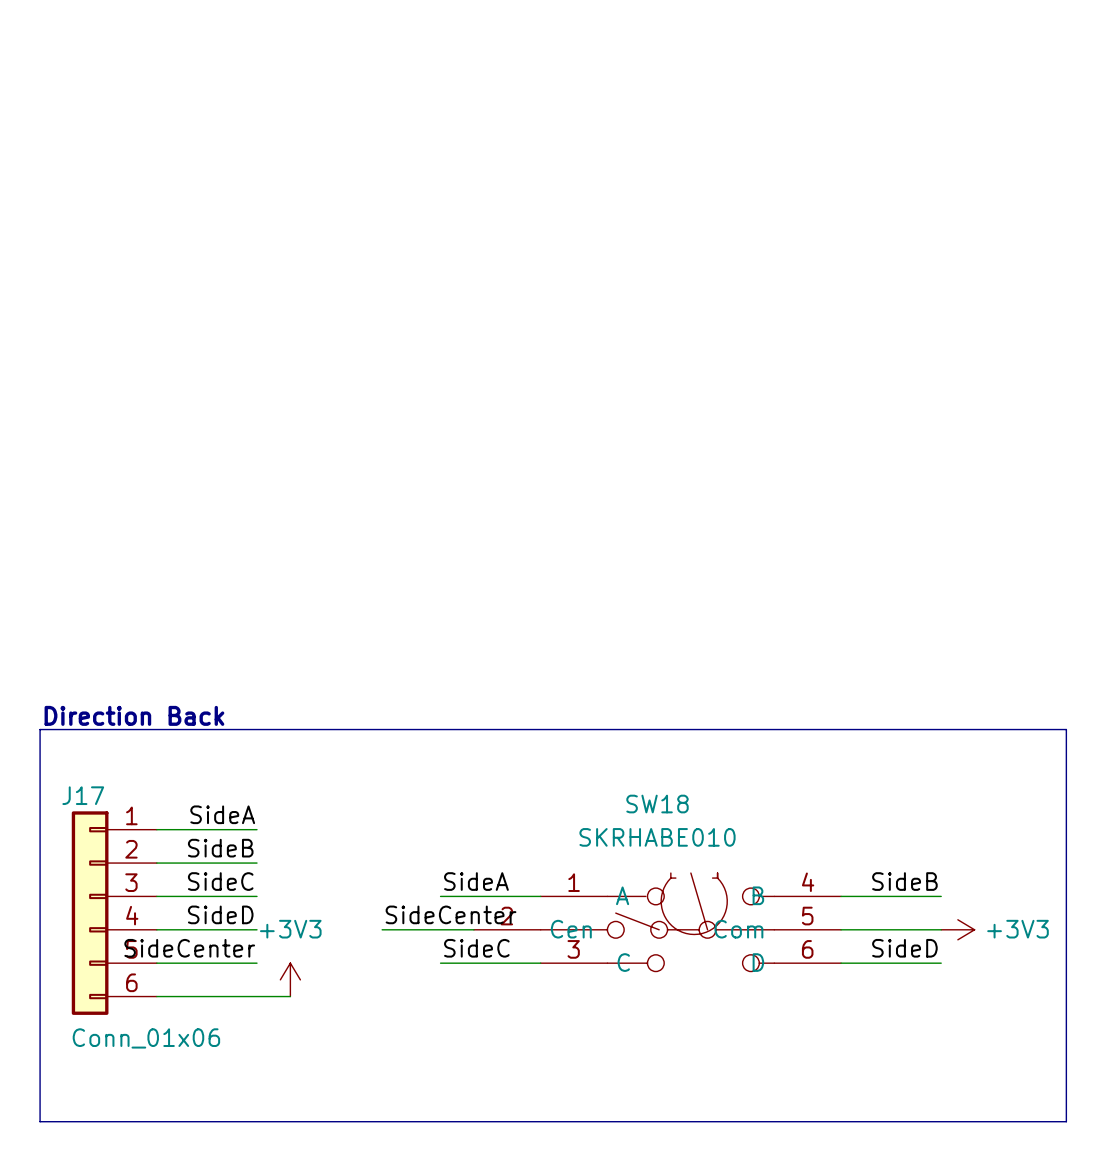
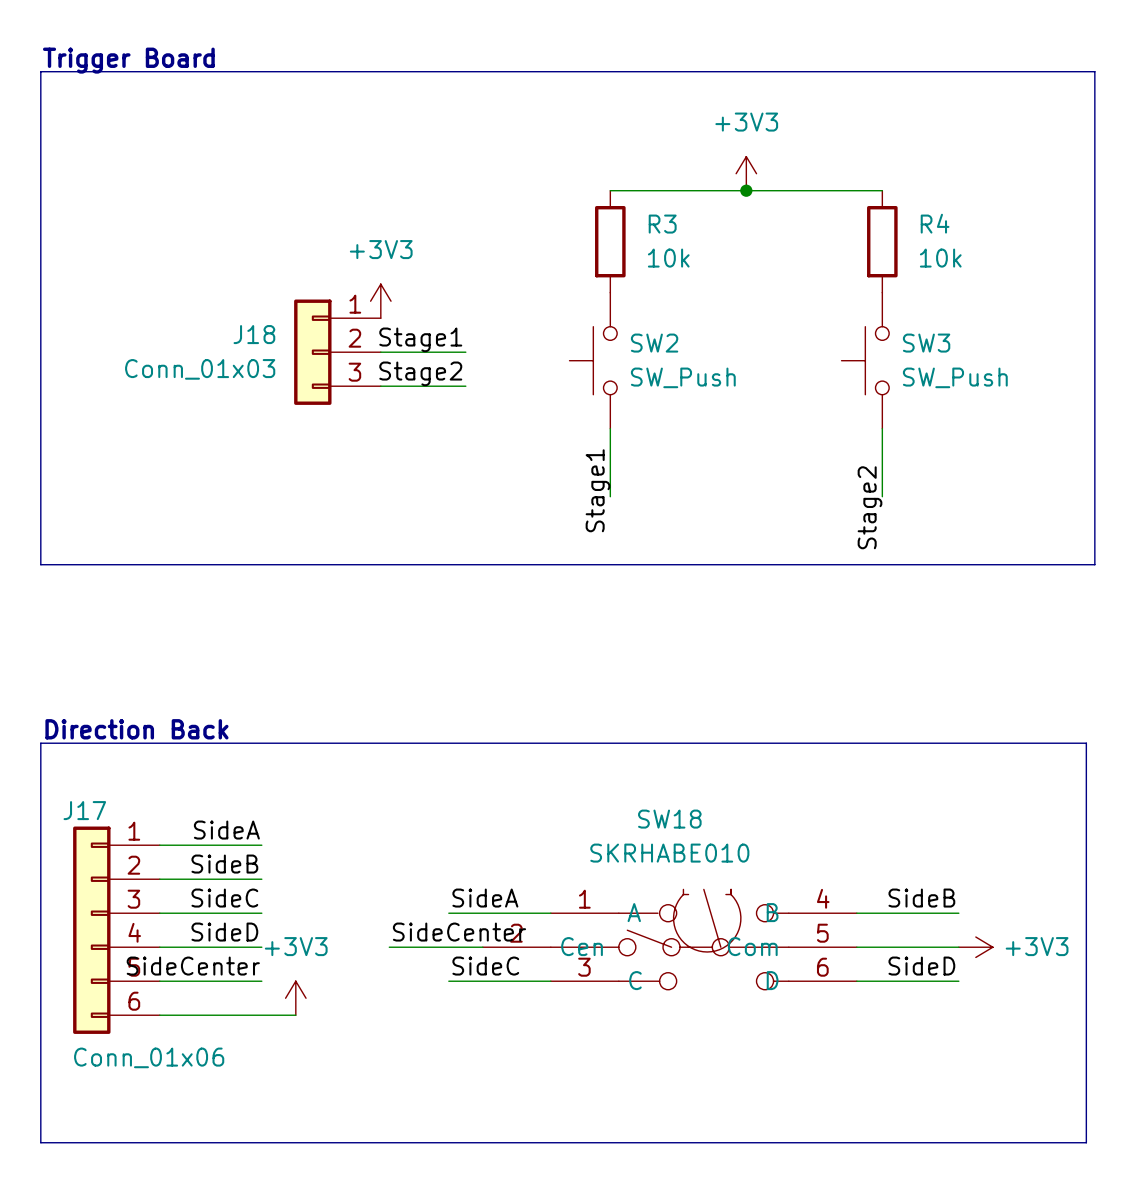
text: none -> Trigger Board (128, 60)
line: none -> (40, 71) (1094, 71) (1094, 564) (40, 564) (40, 71)
power symbol: none -> +3V3 (746, 173)
wire: none -> (610, 190) (882, 190)
junction: none -> (746, 190)
R3: none -> 10k (610, 241)
R4: none -> 10k (882, 241)
power symbol: none -> +3V3 (380, 301)
label: none -> Stage1 (420, 339)
J18: none -> Conn_01x03 (337, 352)
wire: none -> (380, 352) (465, 352)
SW2: none -> SW_Push (593, 360)
SW3: none -> SW_Push (865, 360)
label: none -> Stage2 (420, 373)
wire: none -> (380, 386) (465, 386)
wire: none -> (610, 428) (610, 496)
wire: none -> (882, 428) (882, 496)
label: none -> Stage1 (597, 490)
label: none -> Stage2 (870, 507)

